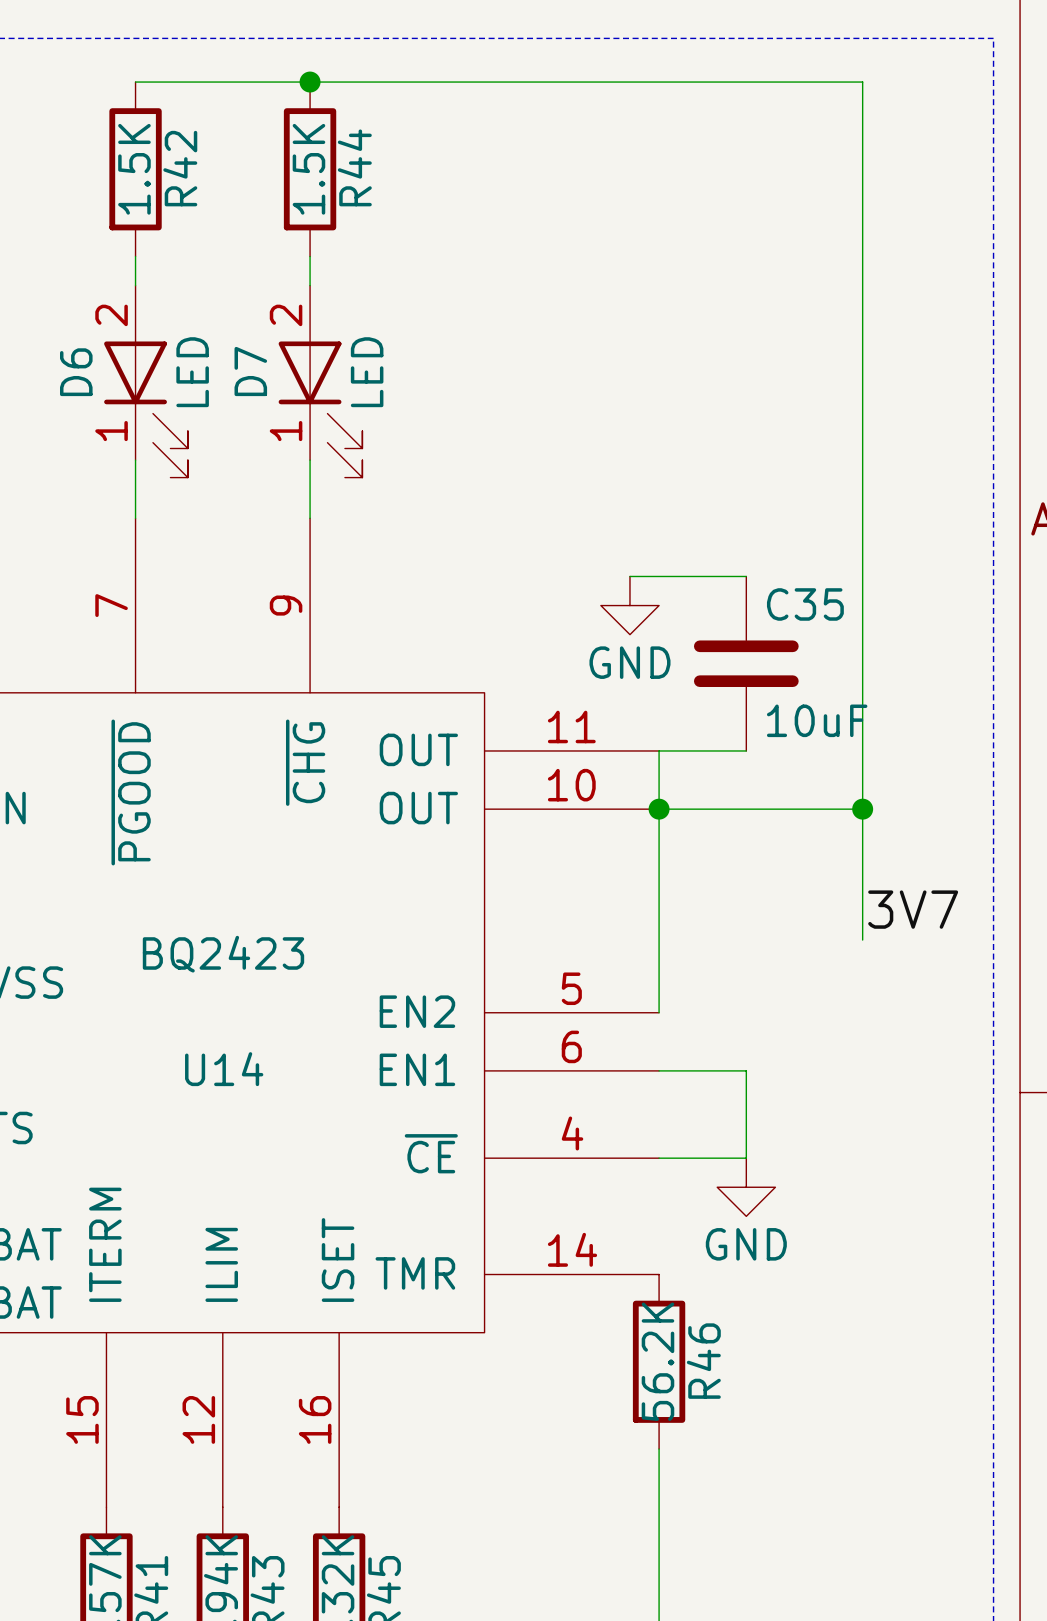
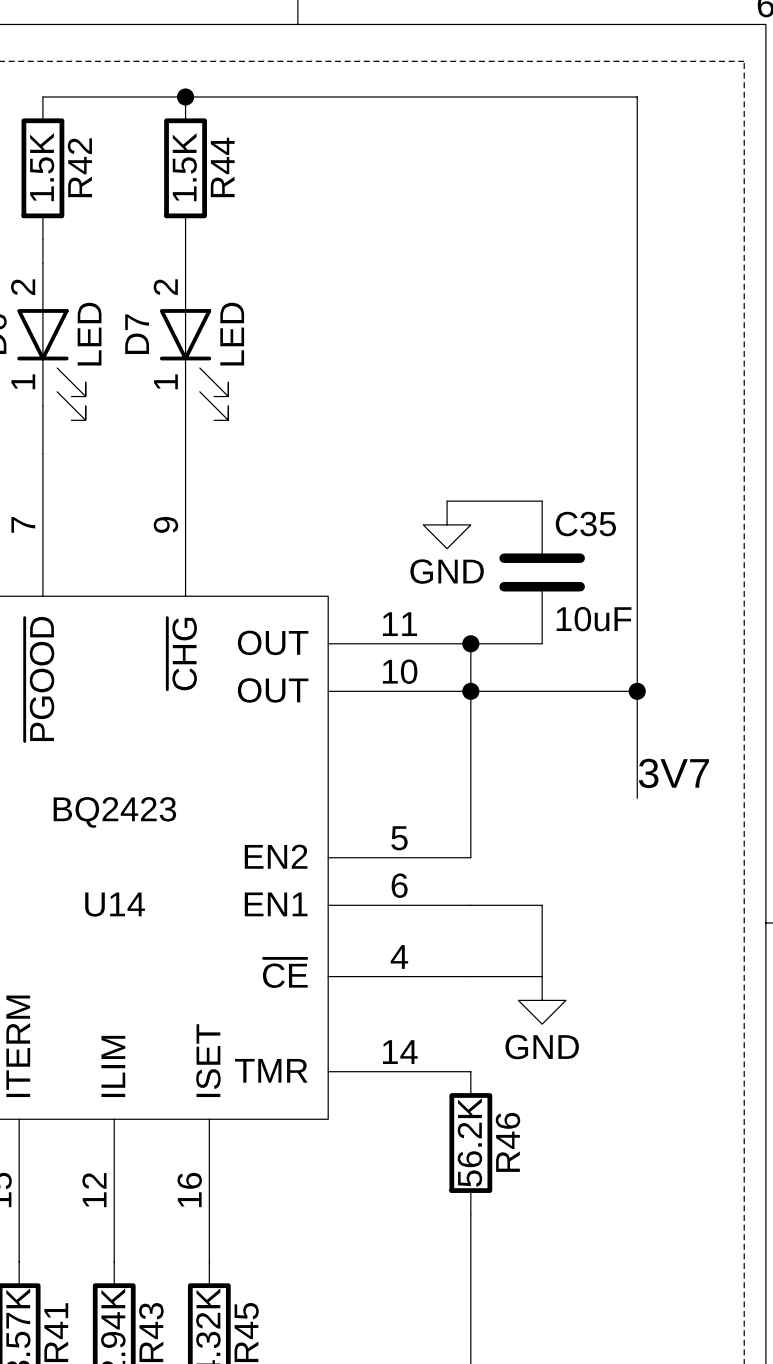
junction: none -> (470, 643)

